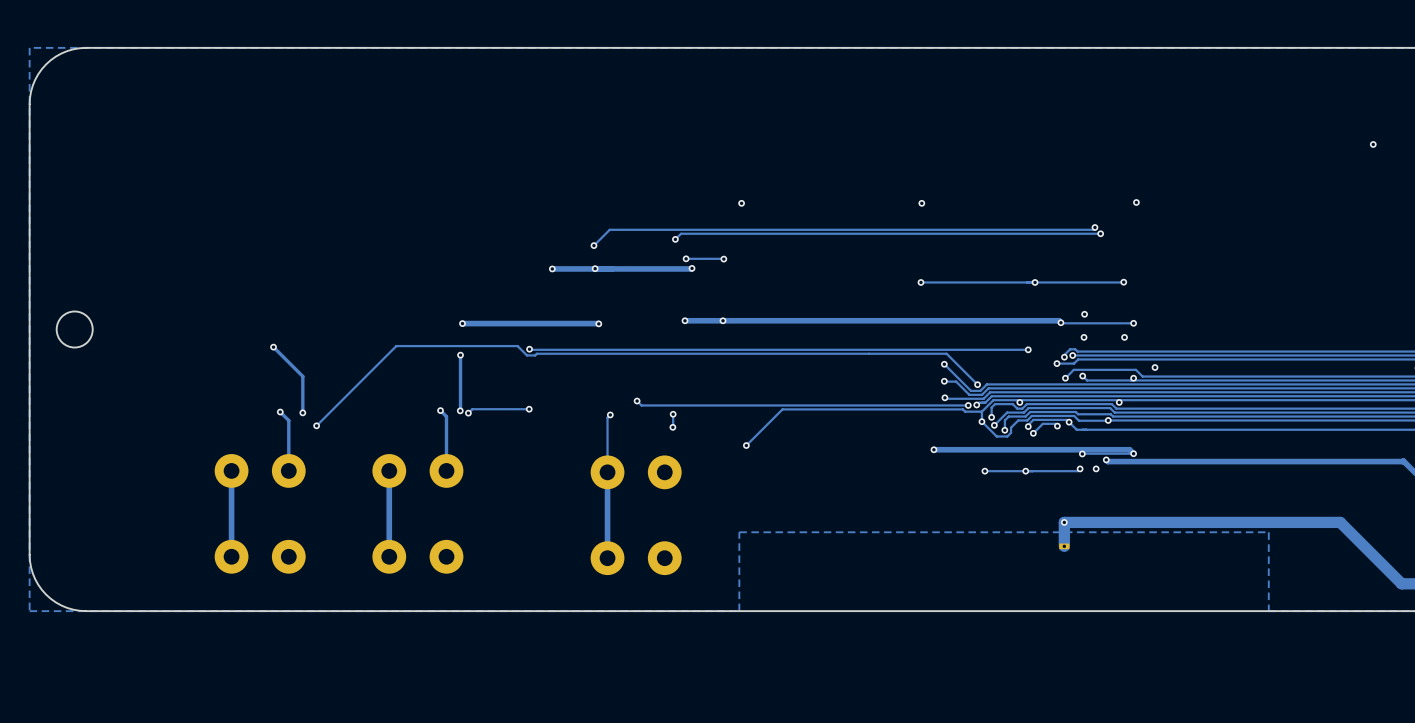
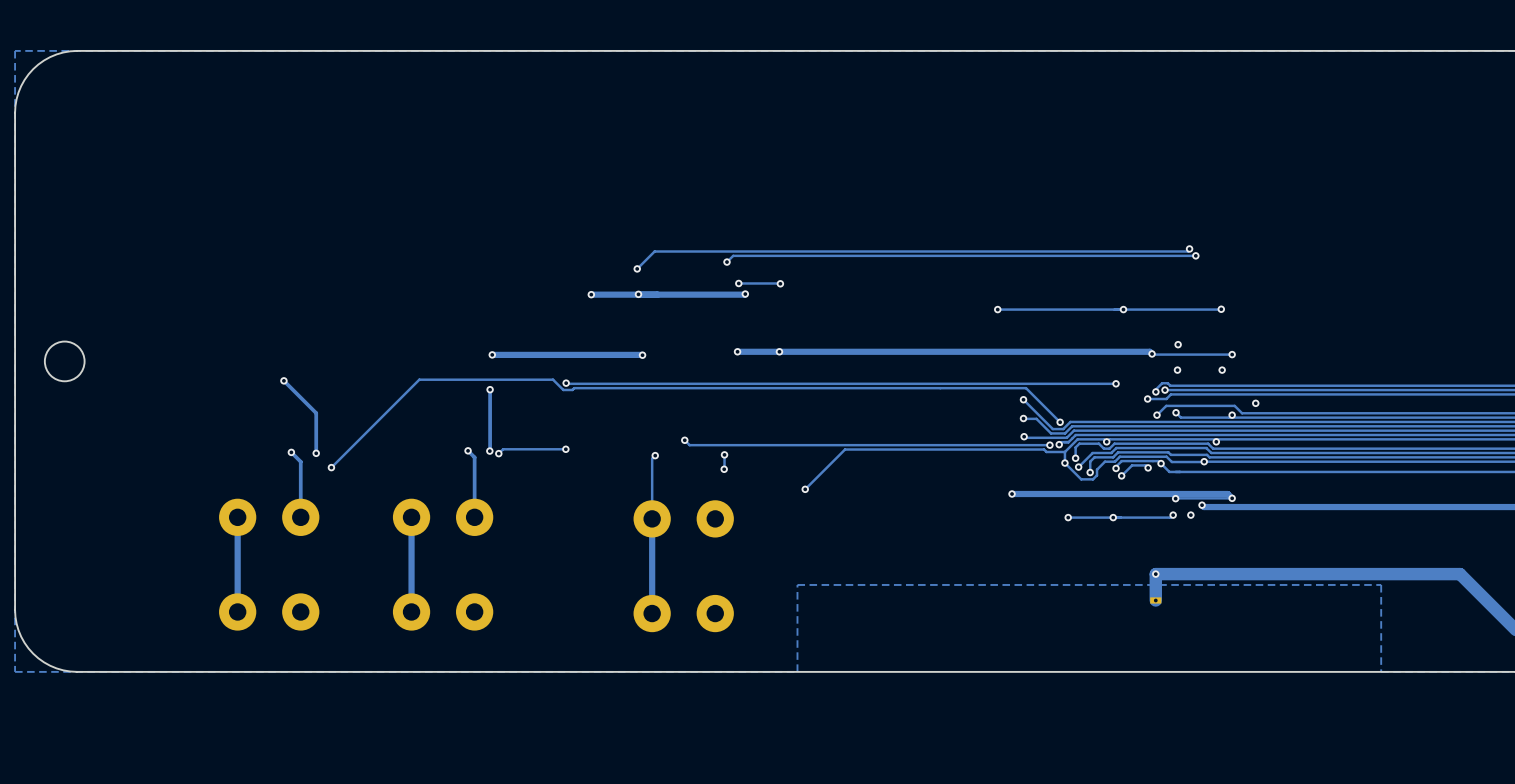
via: (1373, 144) -> none
via: (1136, 202) -> none
via: (741, 203) -> none
via: (921, 203) -> none

